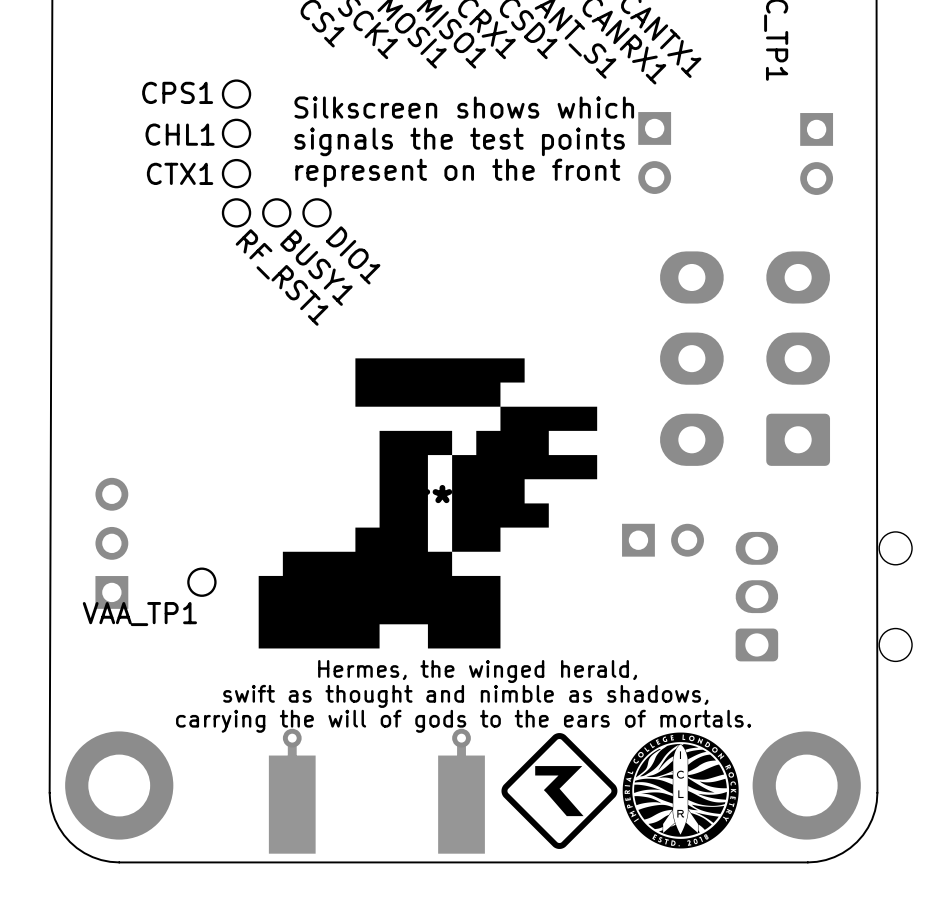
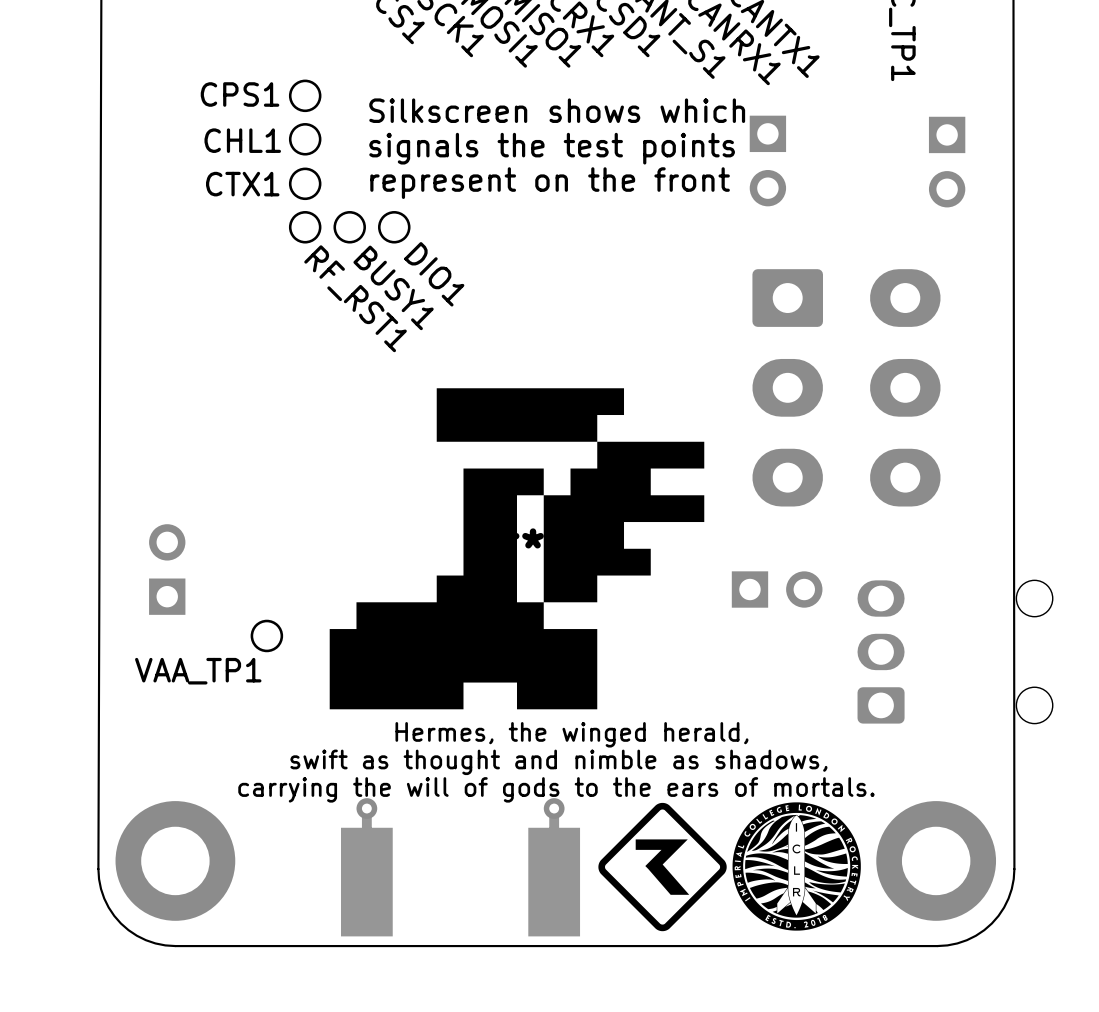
part rotation: 0° (745, 358) -> 180° (846, 387)
part: none -> (167, 569)
part: (111, 543) -> none

